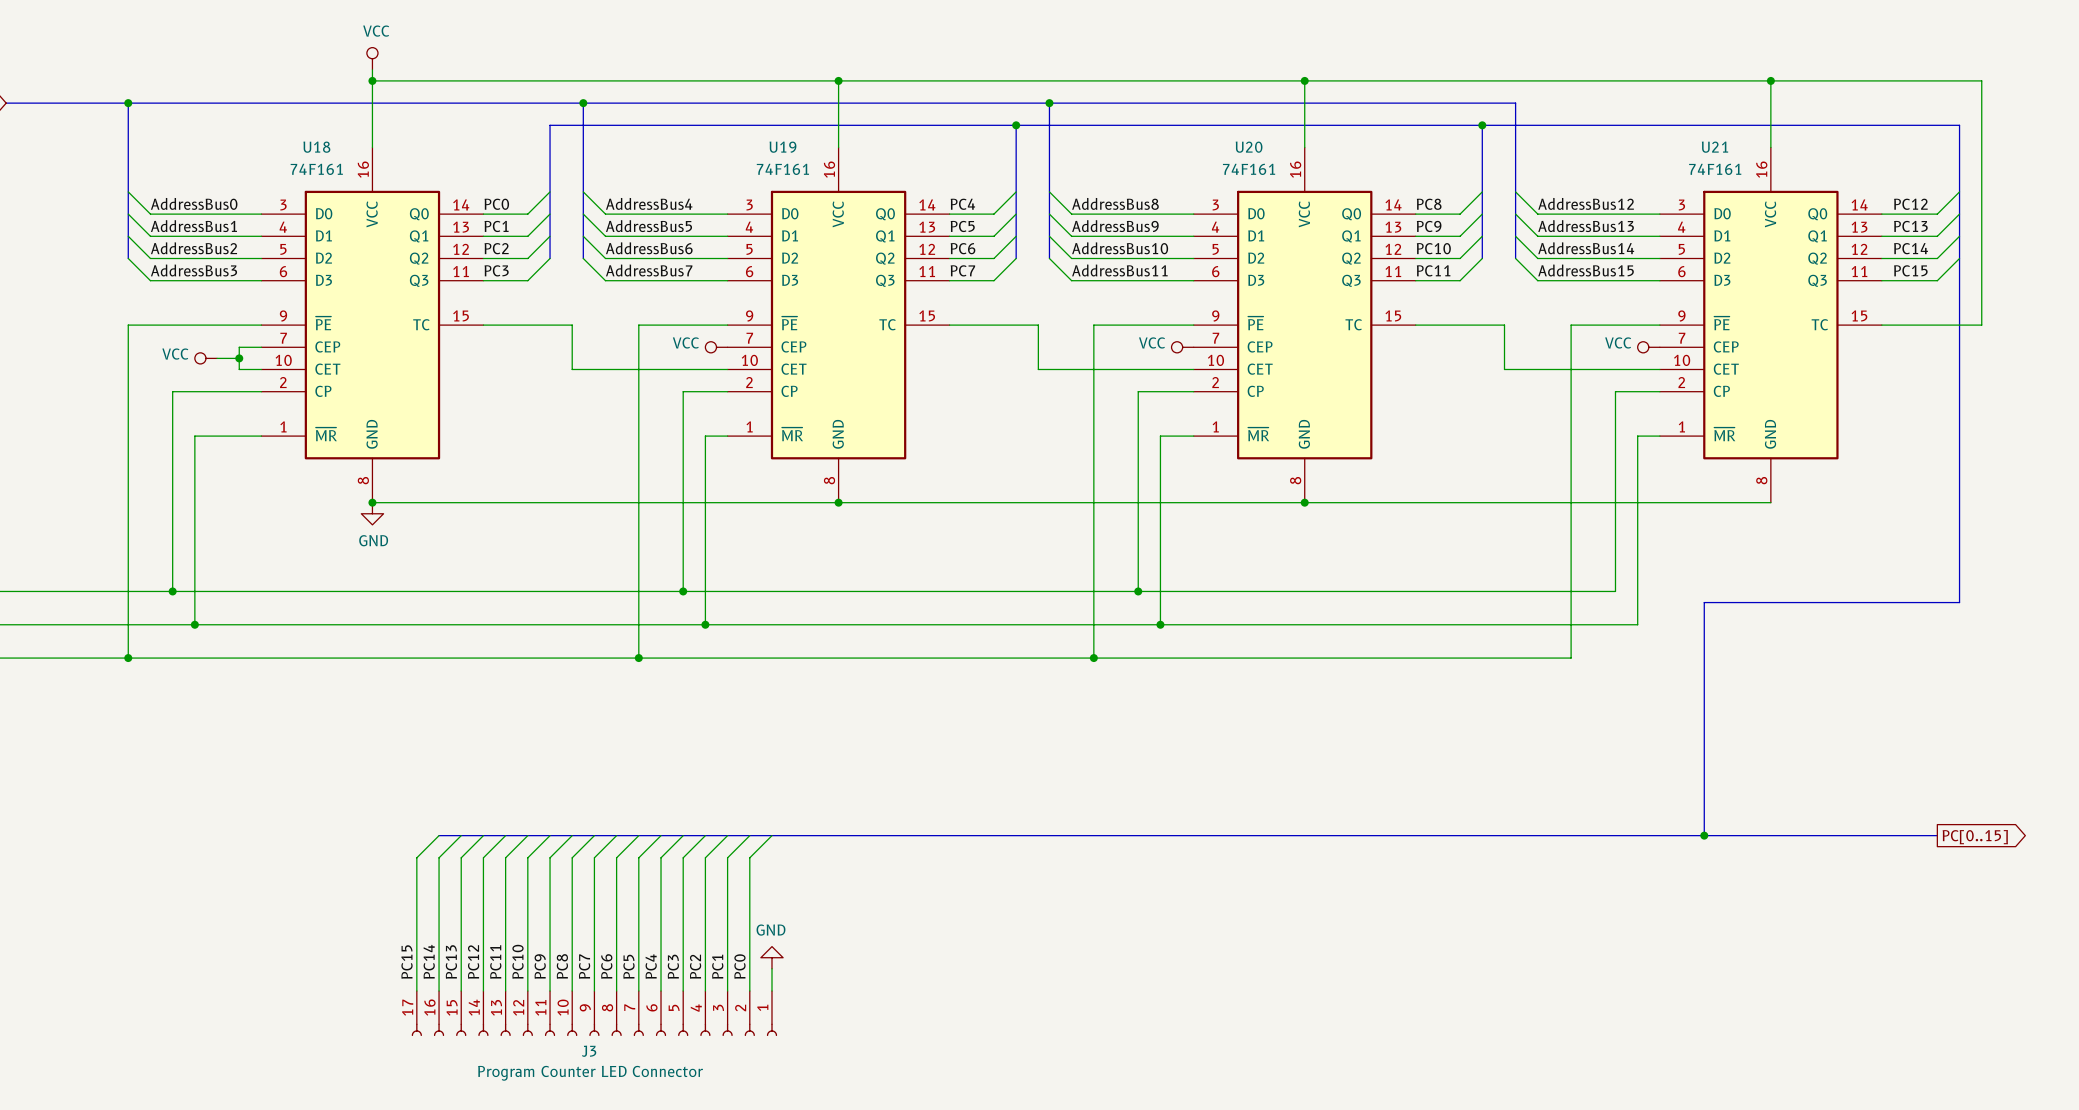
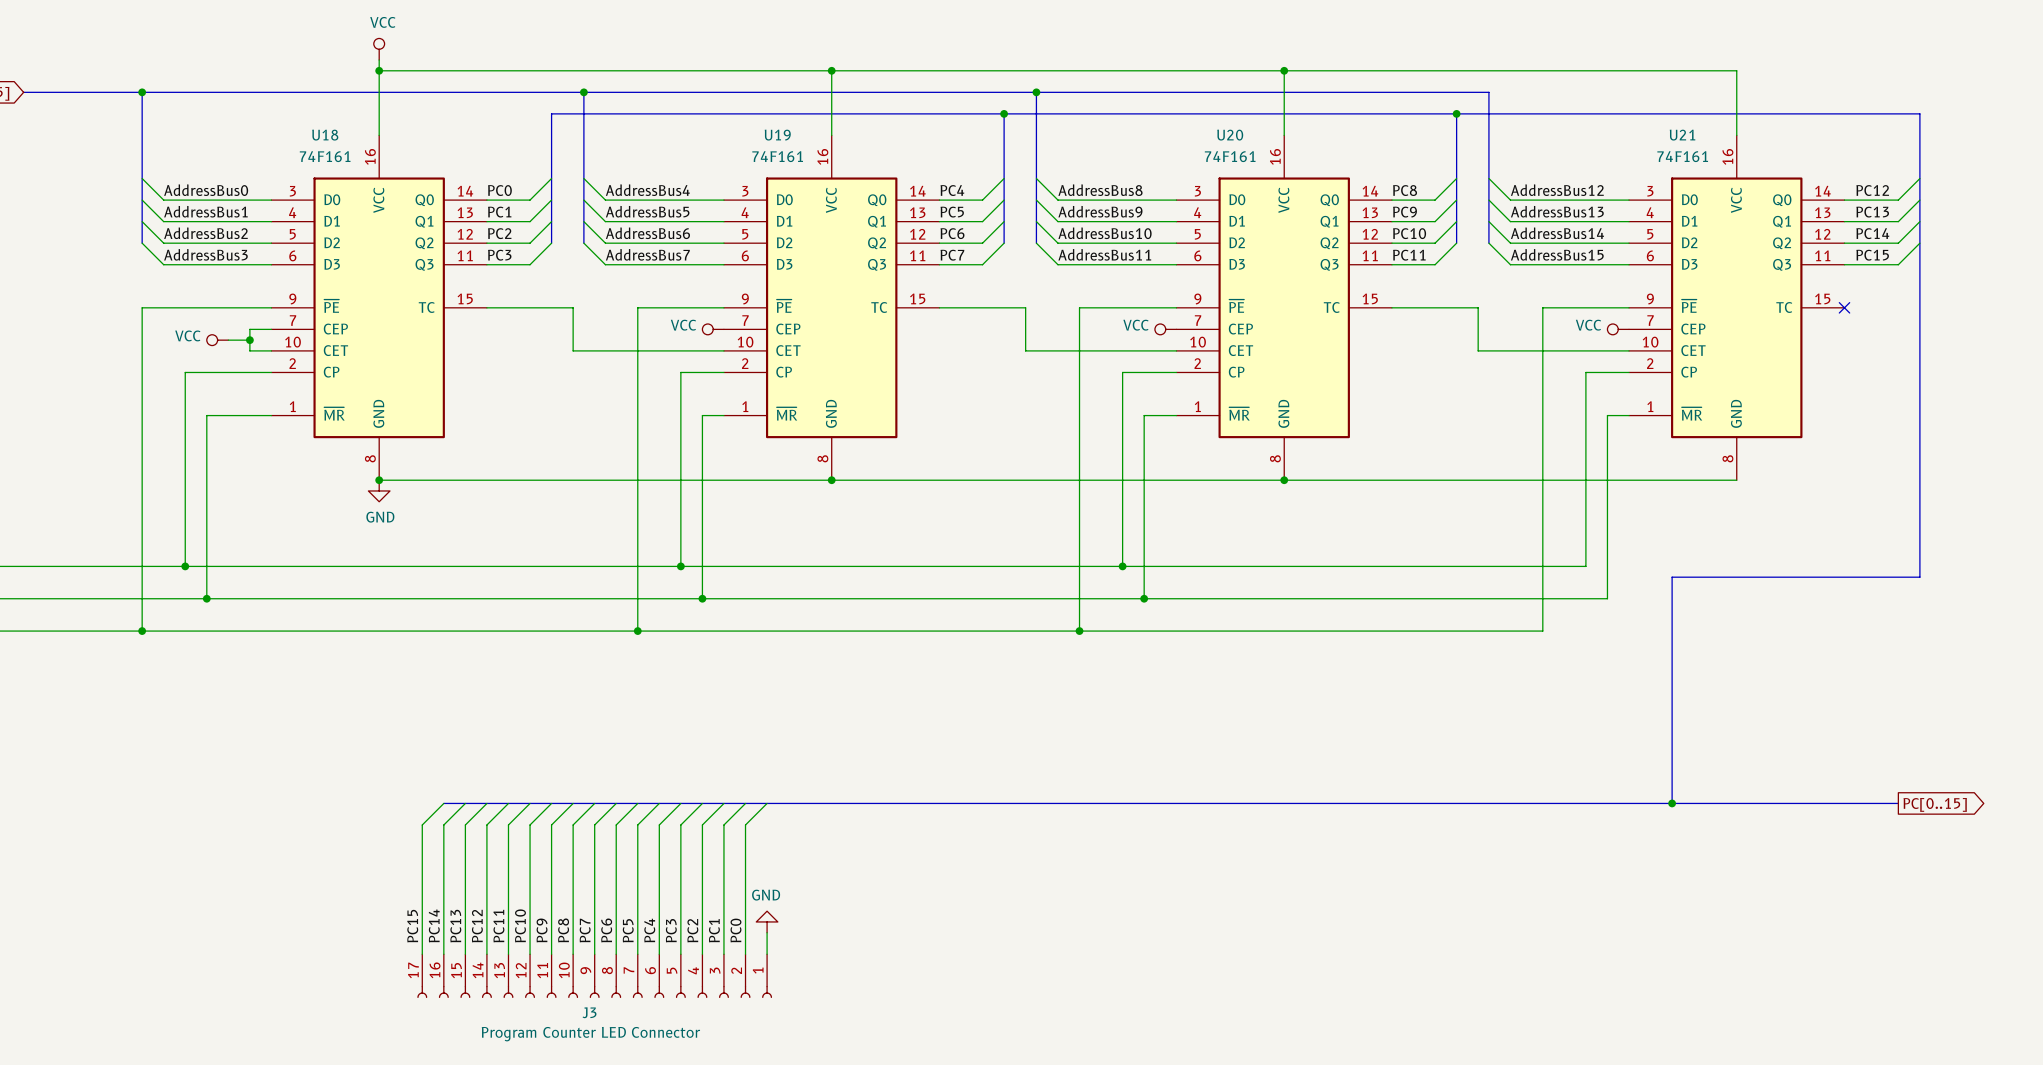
wire: (1770, 80) (1981, 80) (1981, 325) (1881, 325) -> none
junction: (1770, 80) -> none
no-connect mark: none -> (1844, 307)

